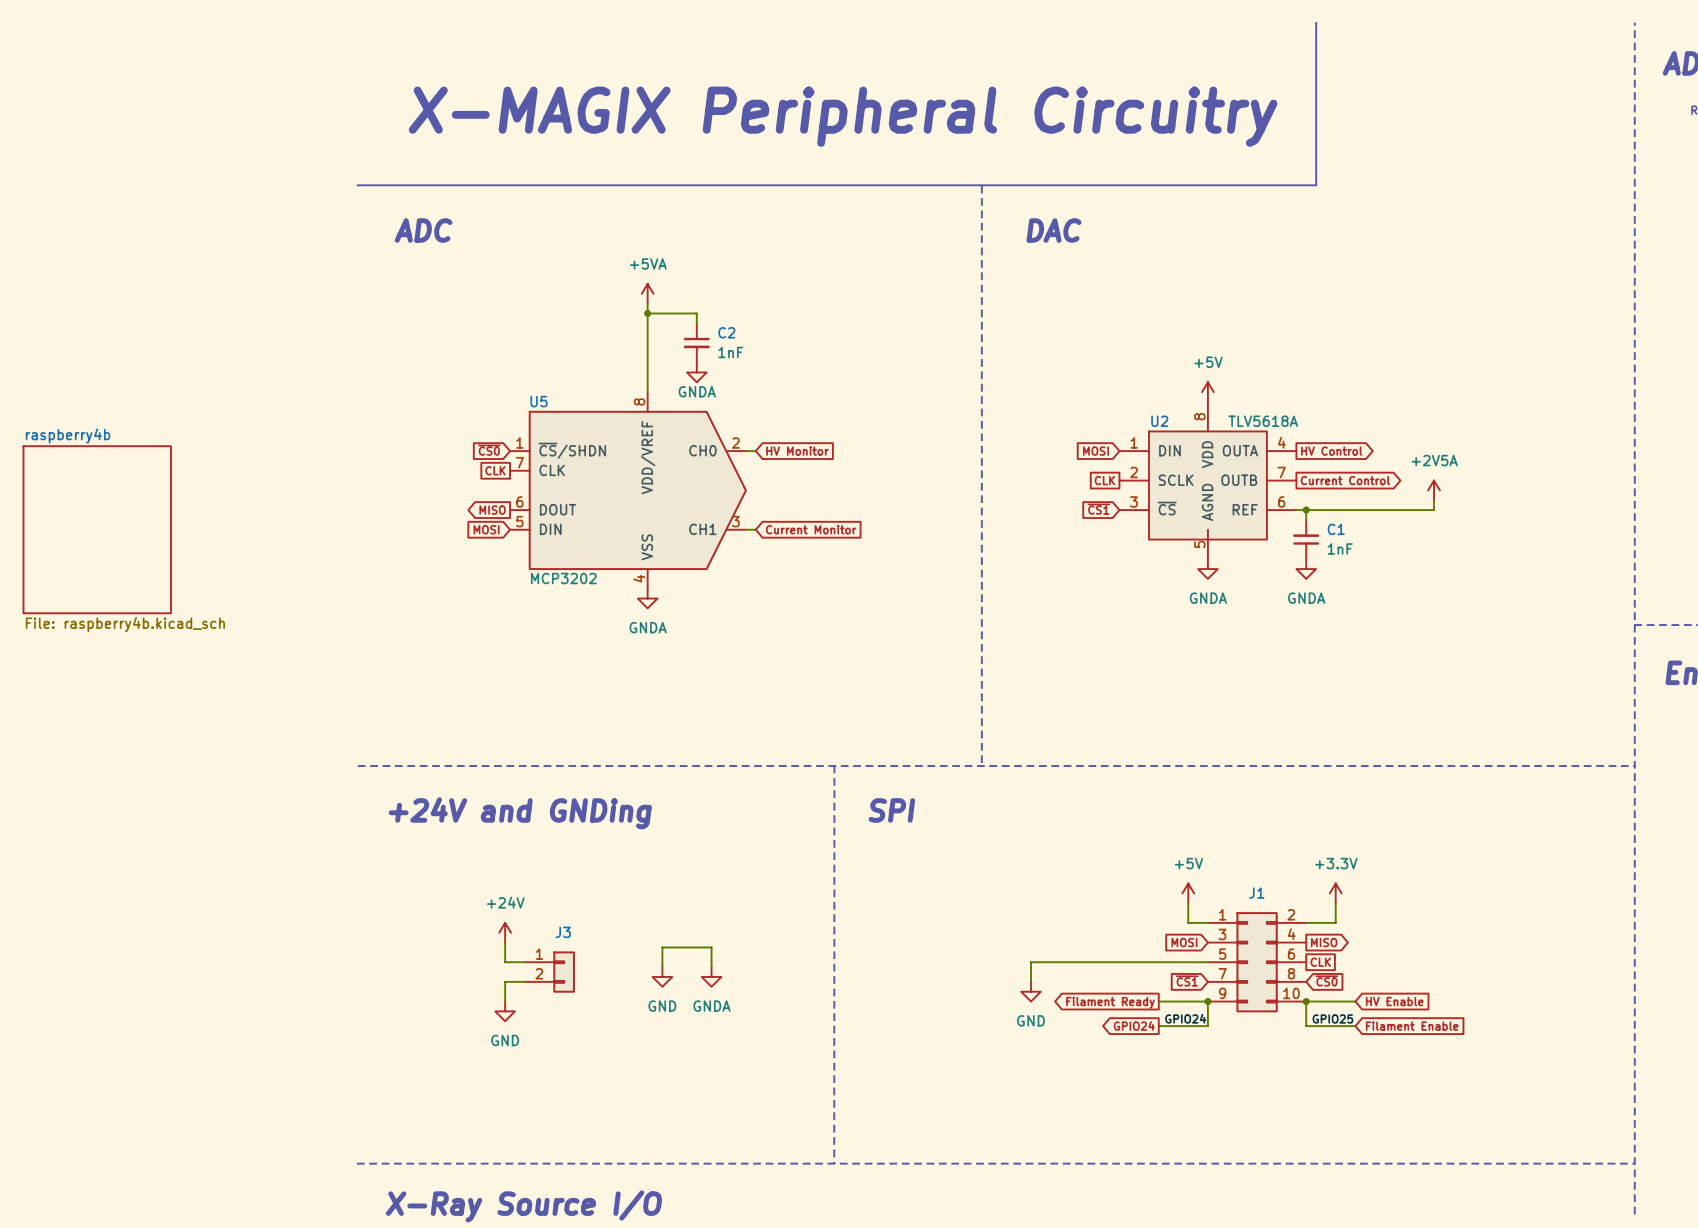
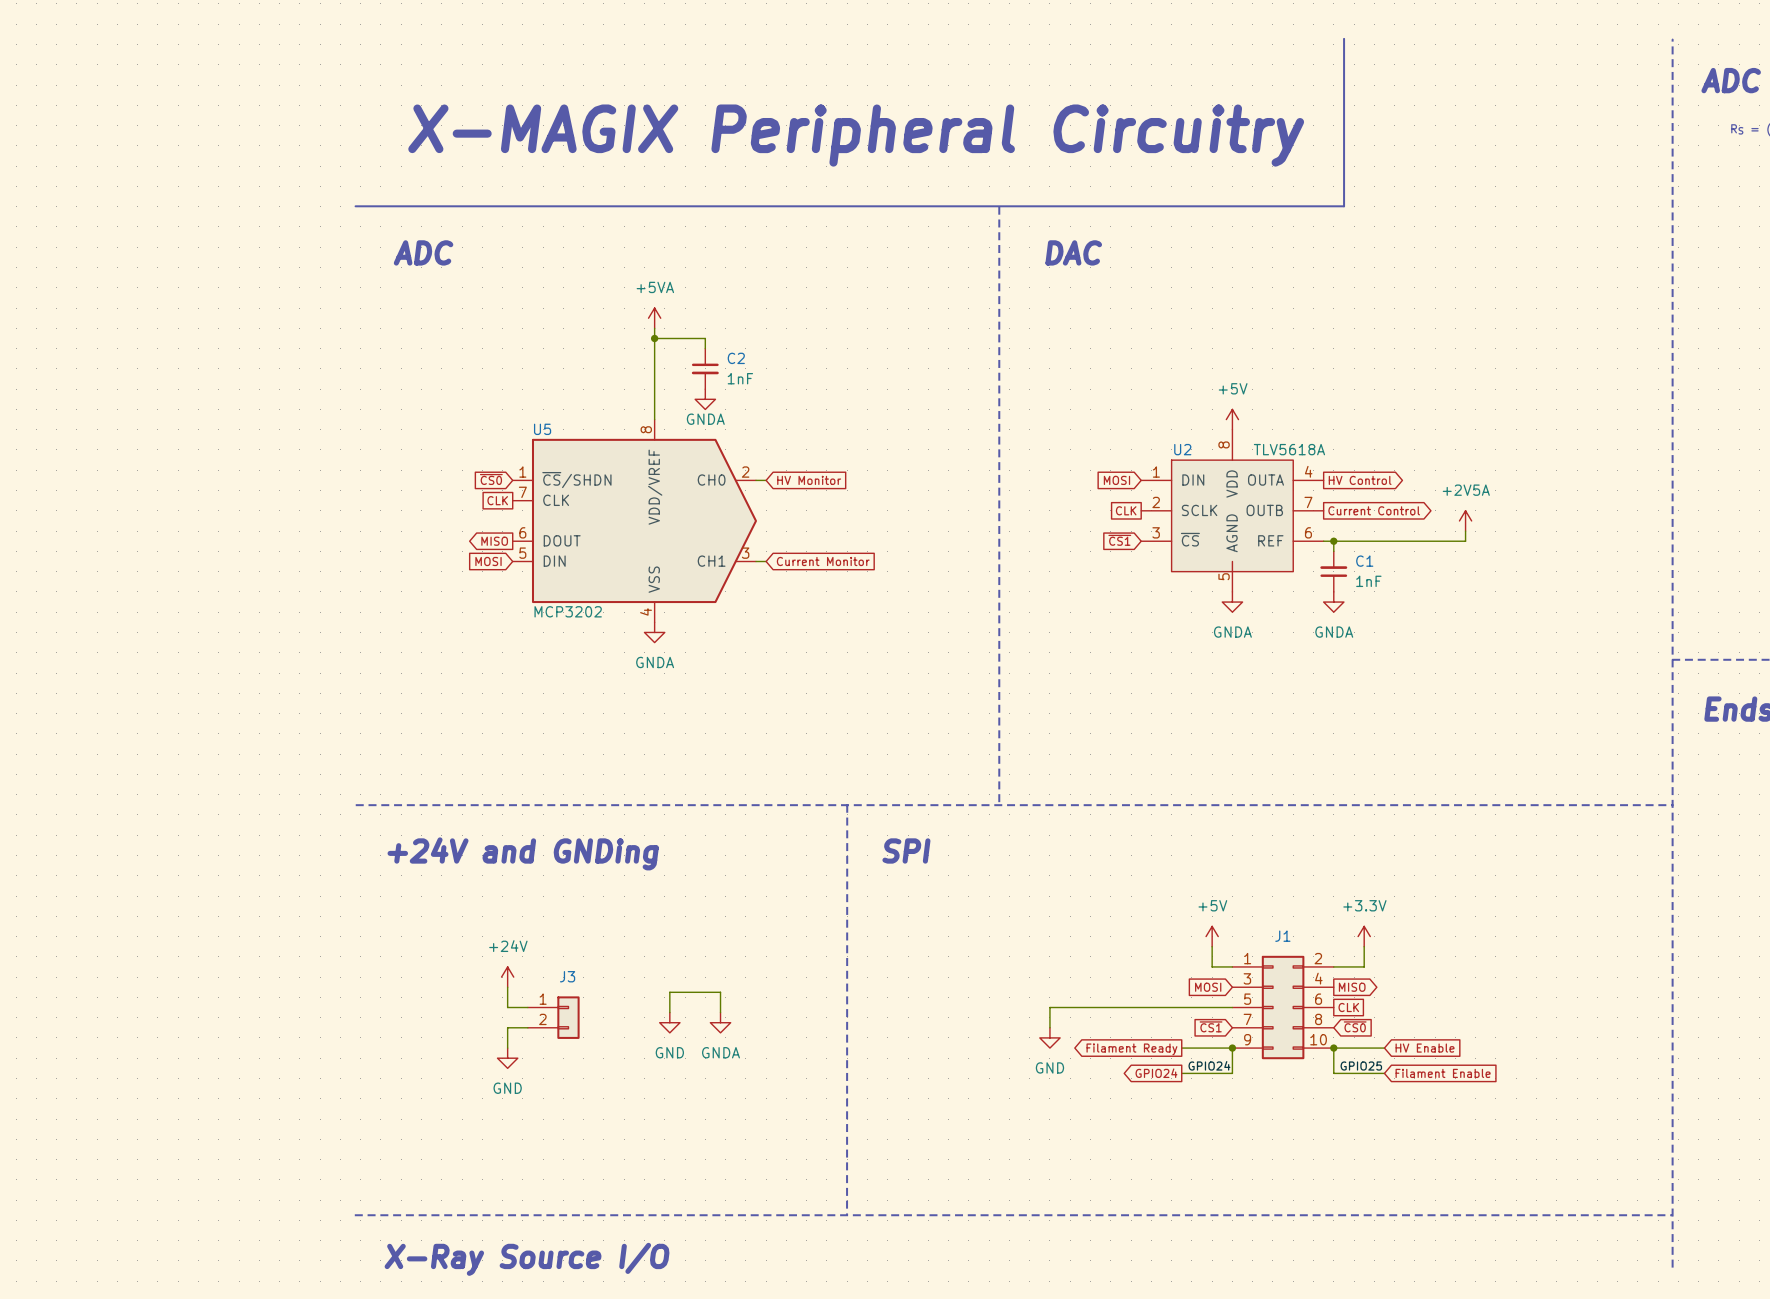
sheet raspberry4b: File: raspberry4b.kicad_sch (97, 529) -> none

